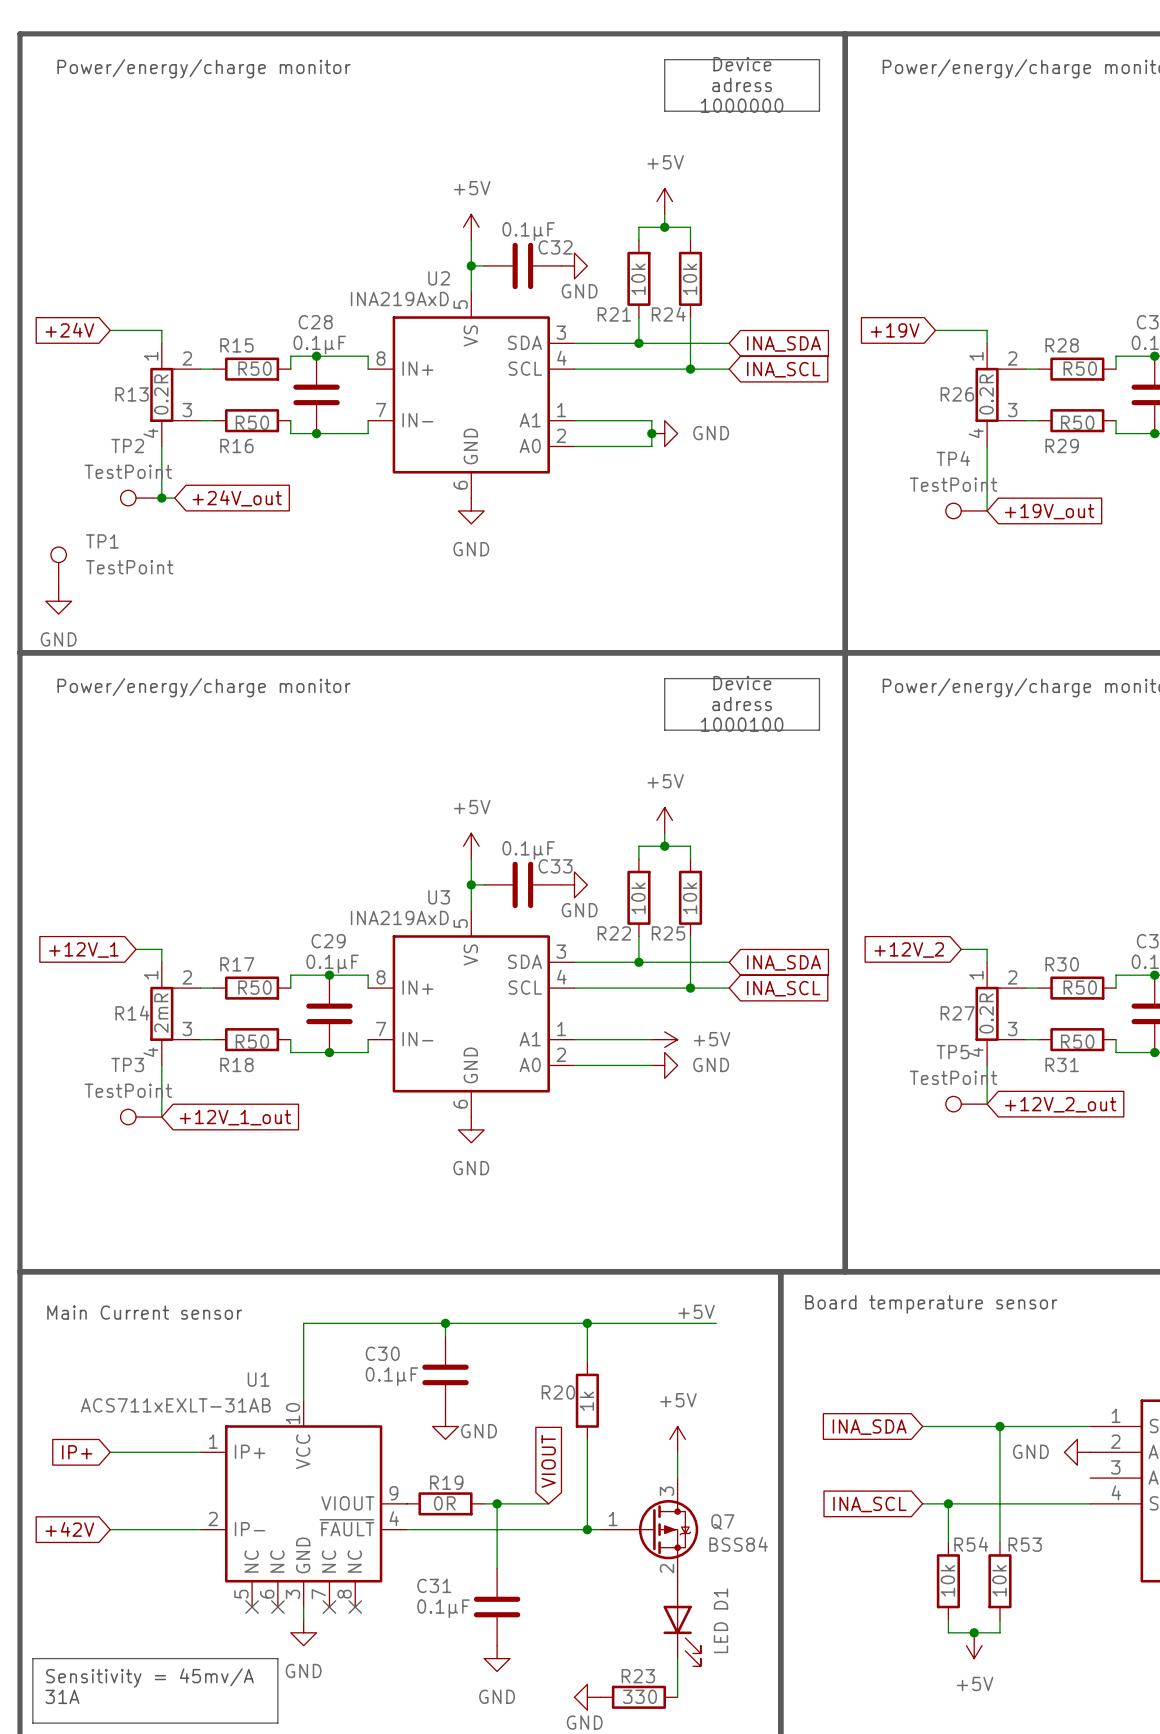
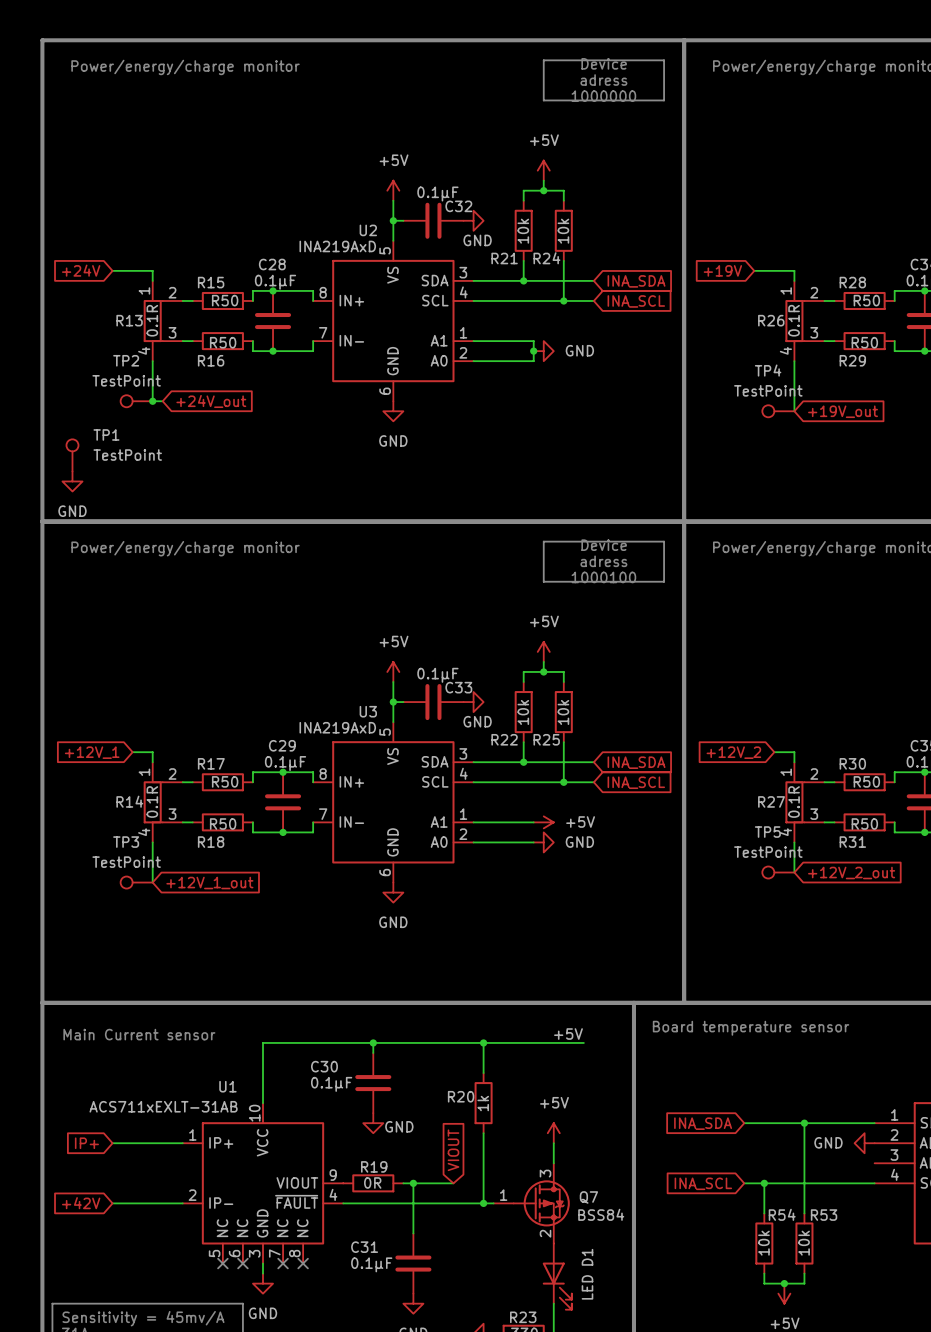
R13 value: 0.2R (161, 394) -> 0.1R (152, 320)
R26 value: 0.2R (986, 394) -> 0.1R (794, 320)
R14 value: 2mR (161, 1013) -> 0.1R (152, 802)
R27 value: 0.2R (986, 1013) -> 0.1R (794, 802)

